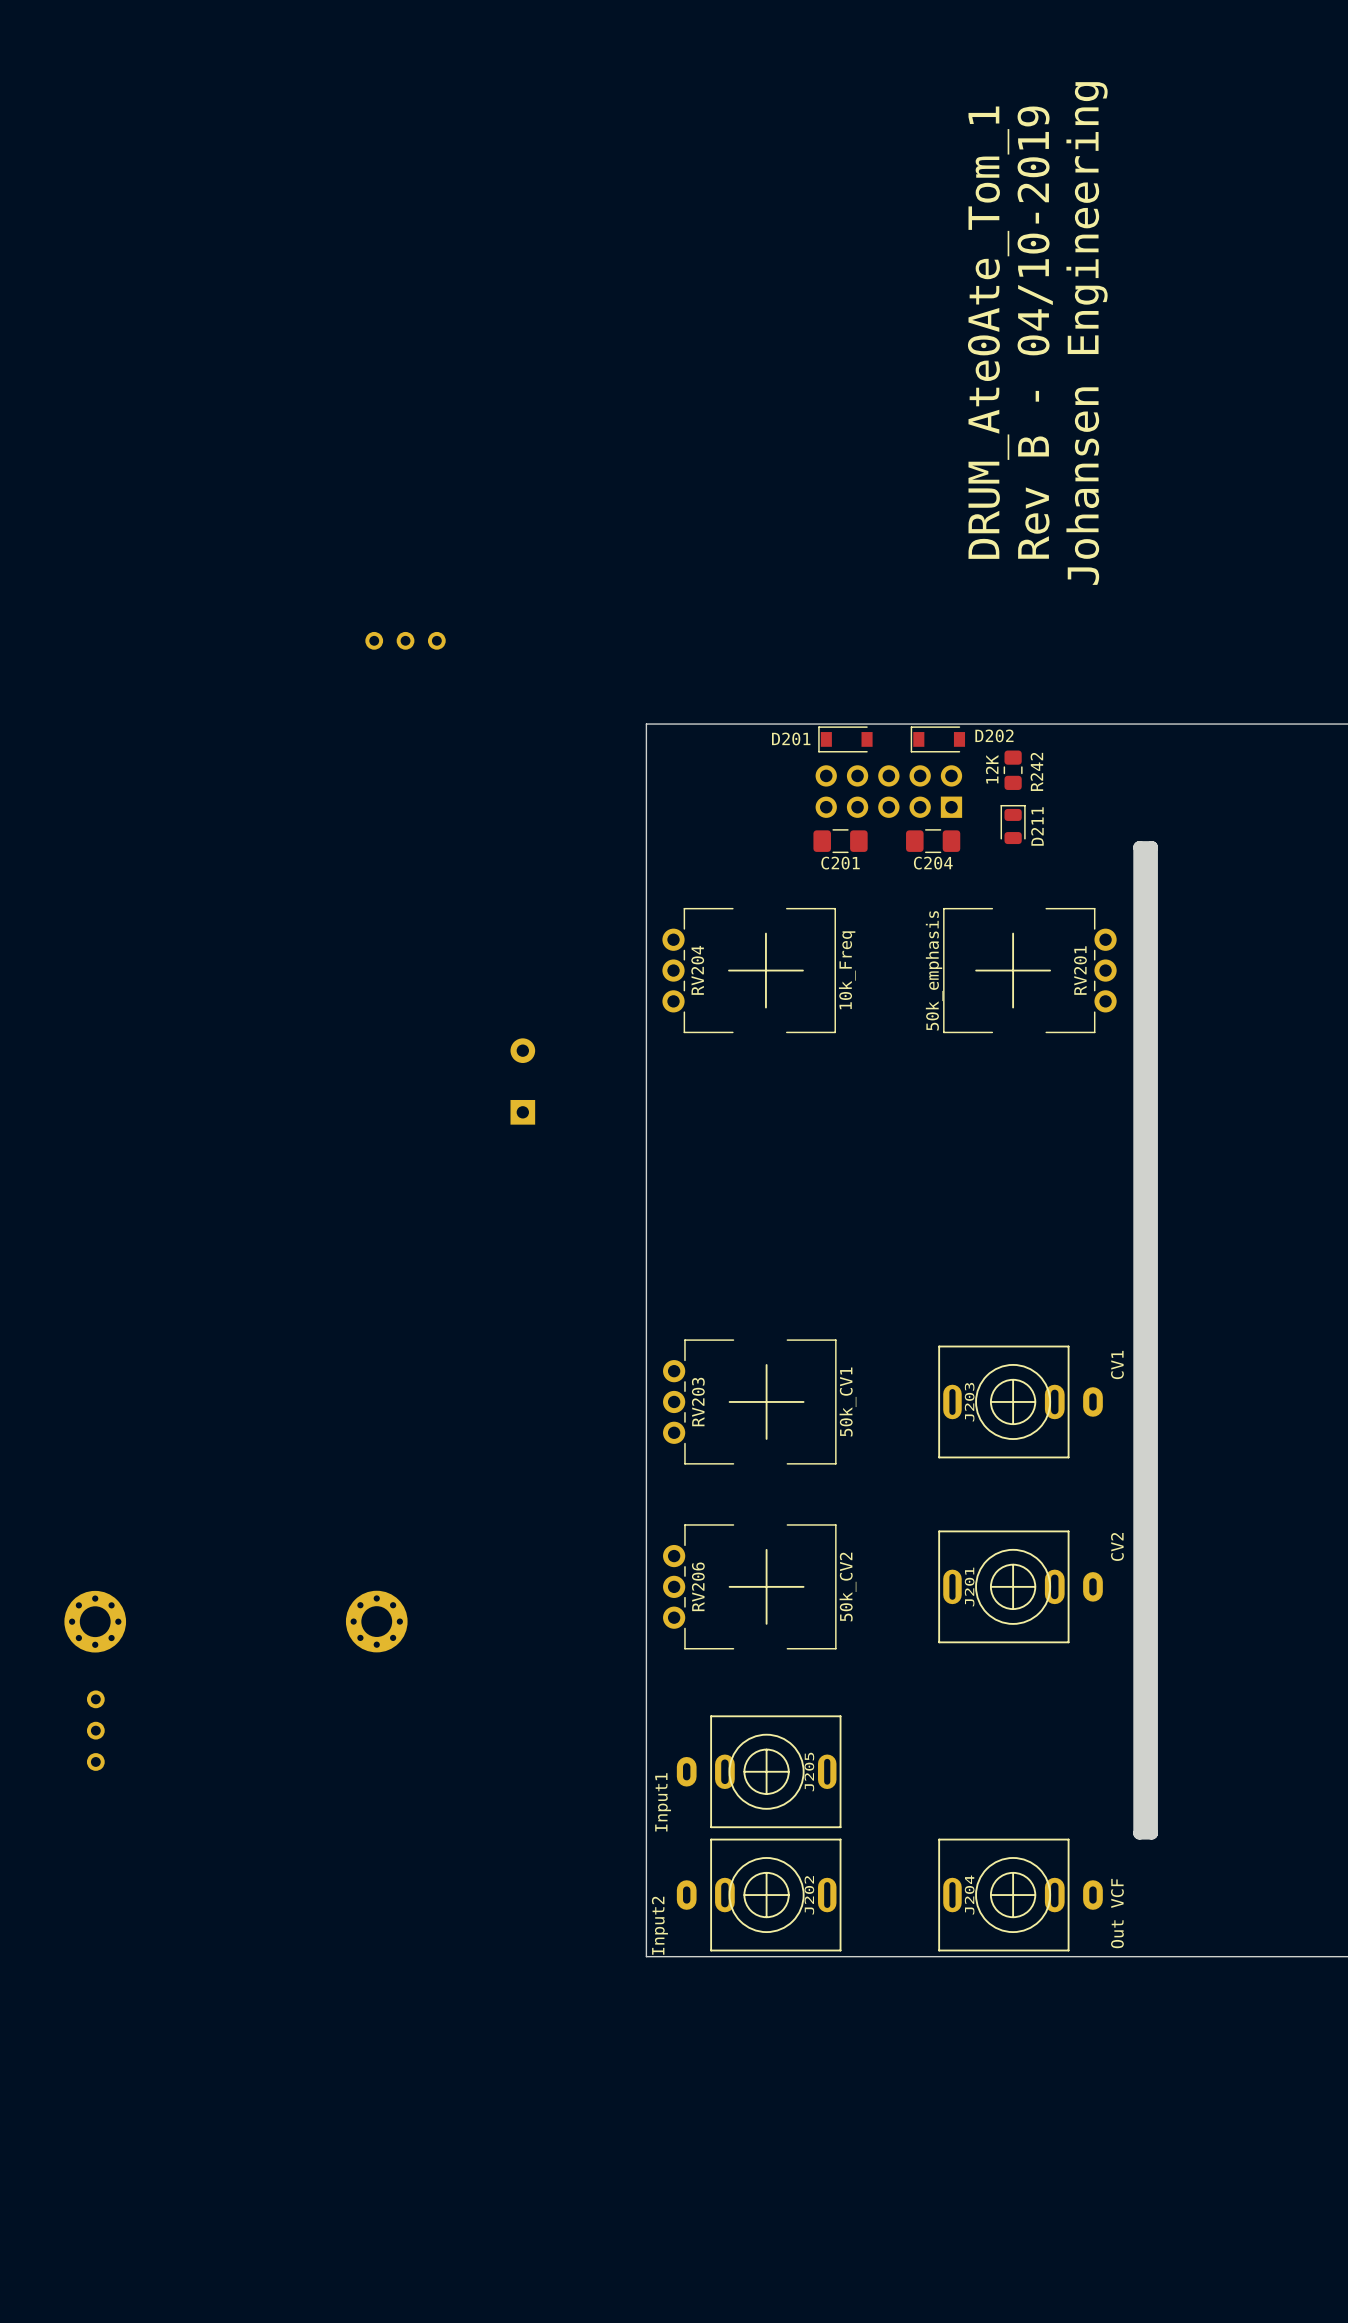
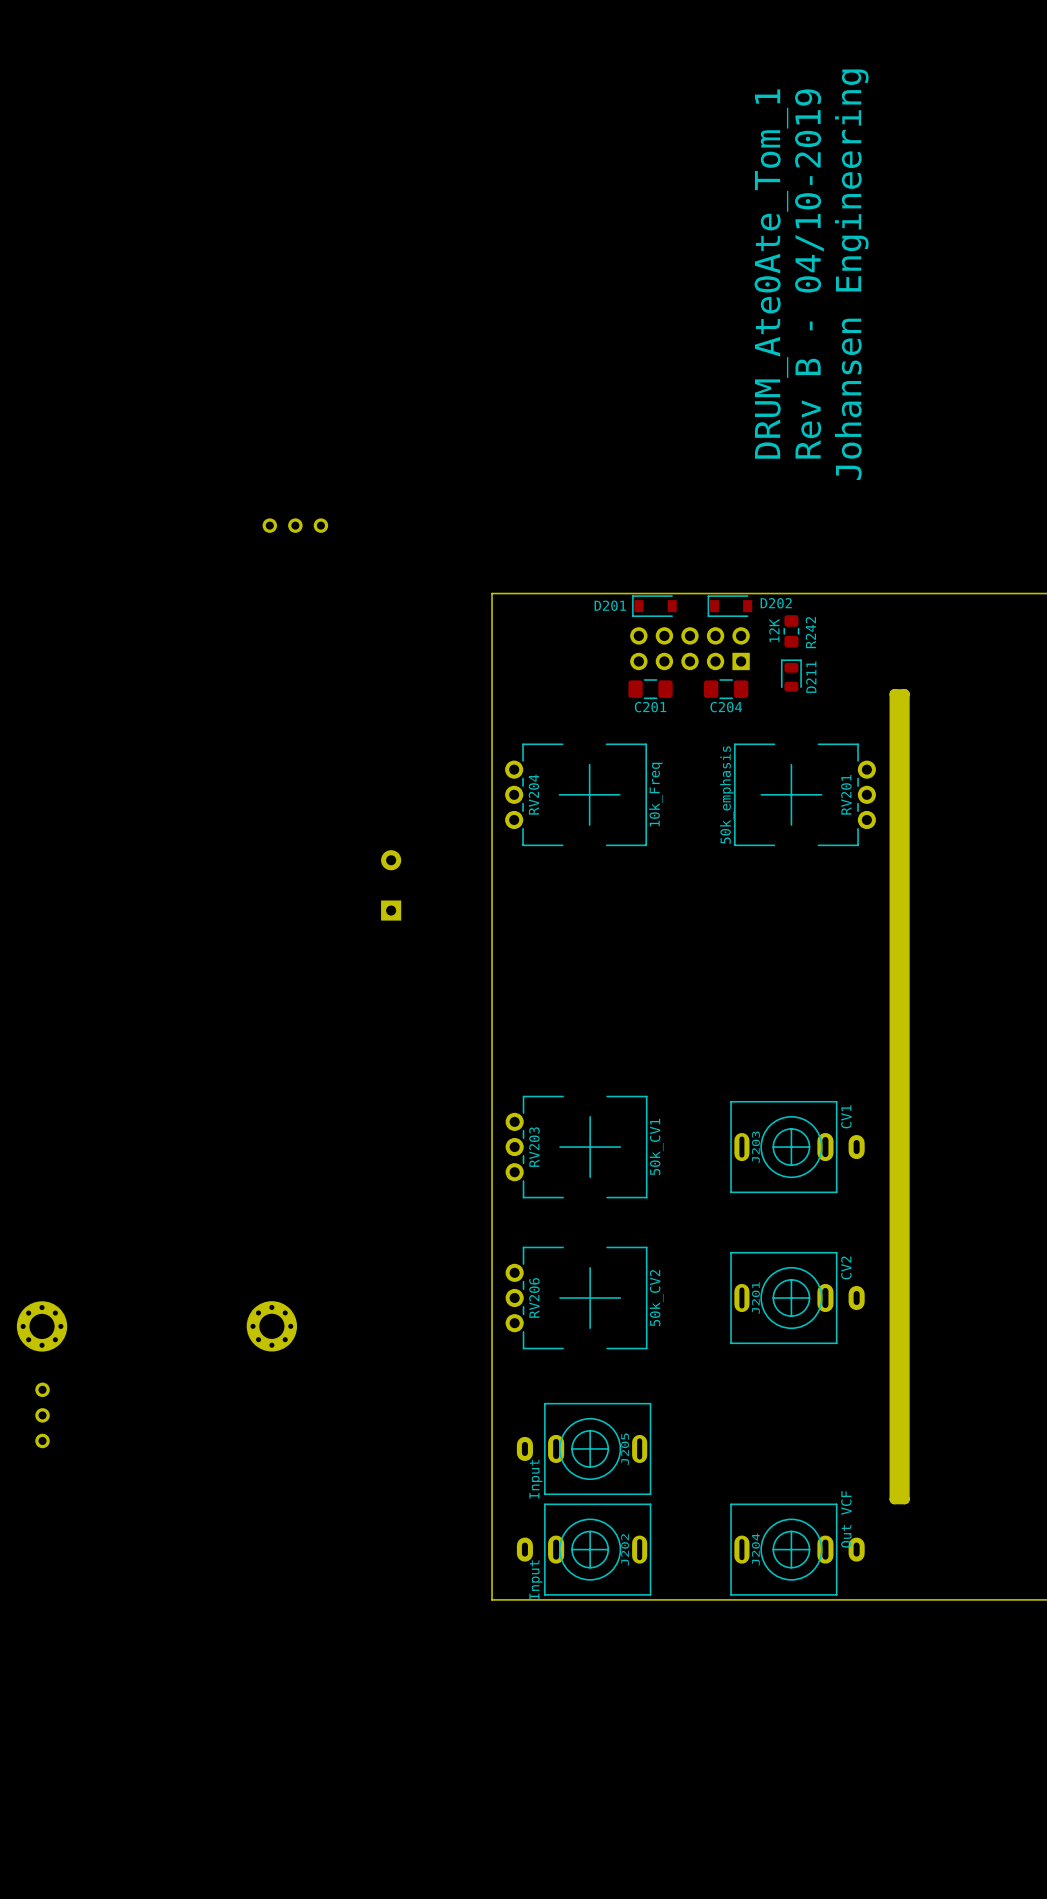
J203 value position: CV1 (1117, 1365) -> CV1 (846, 1116)
J201 value position: CV2 (1117, 1546) -> CV2 (846, 1267)
J205 value: Input1 (663, 1802) -> Input (535, 1479)
J204 value position: Out VCF (1117, 1913) -> Out VCF (846, 1519)
J202 value: Input2 (659, 1925) -> Input (535, 1579)

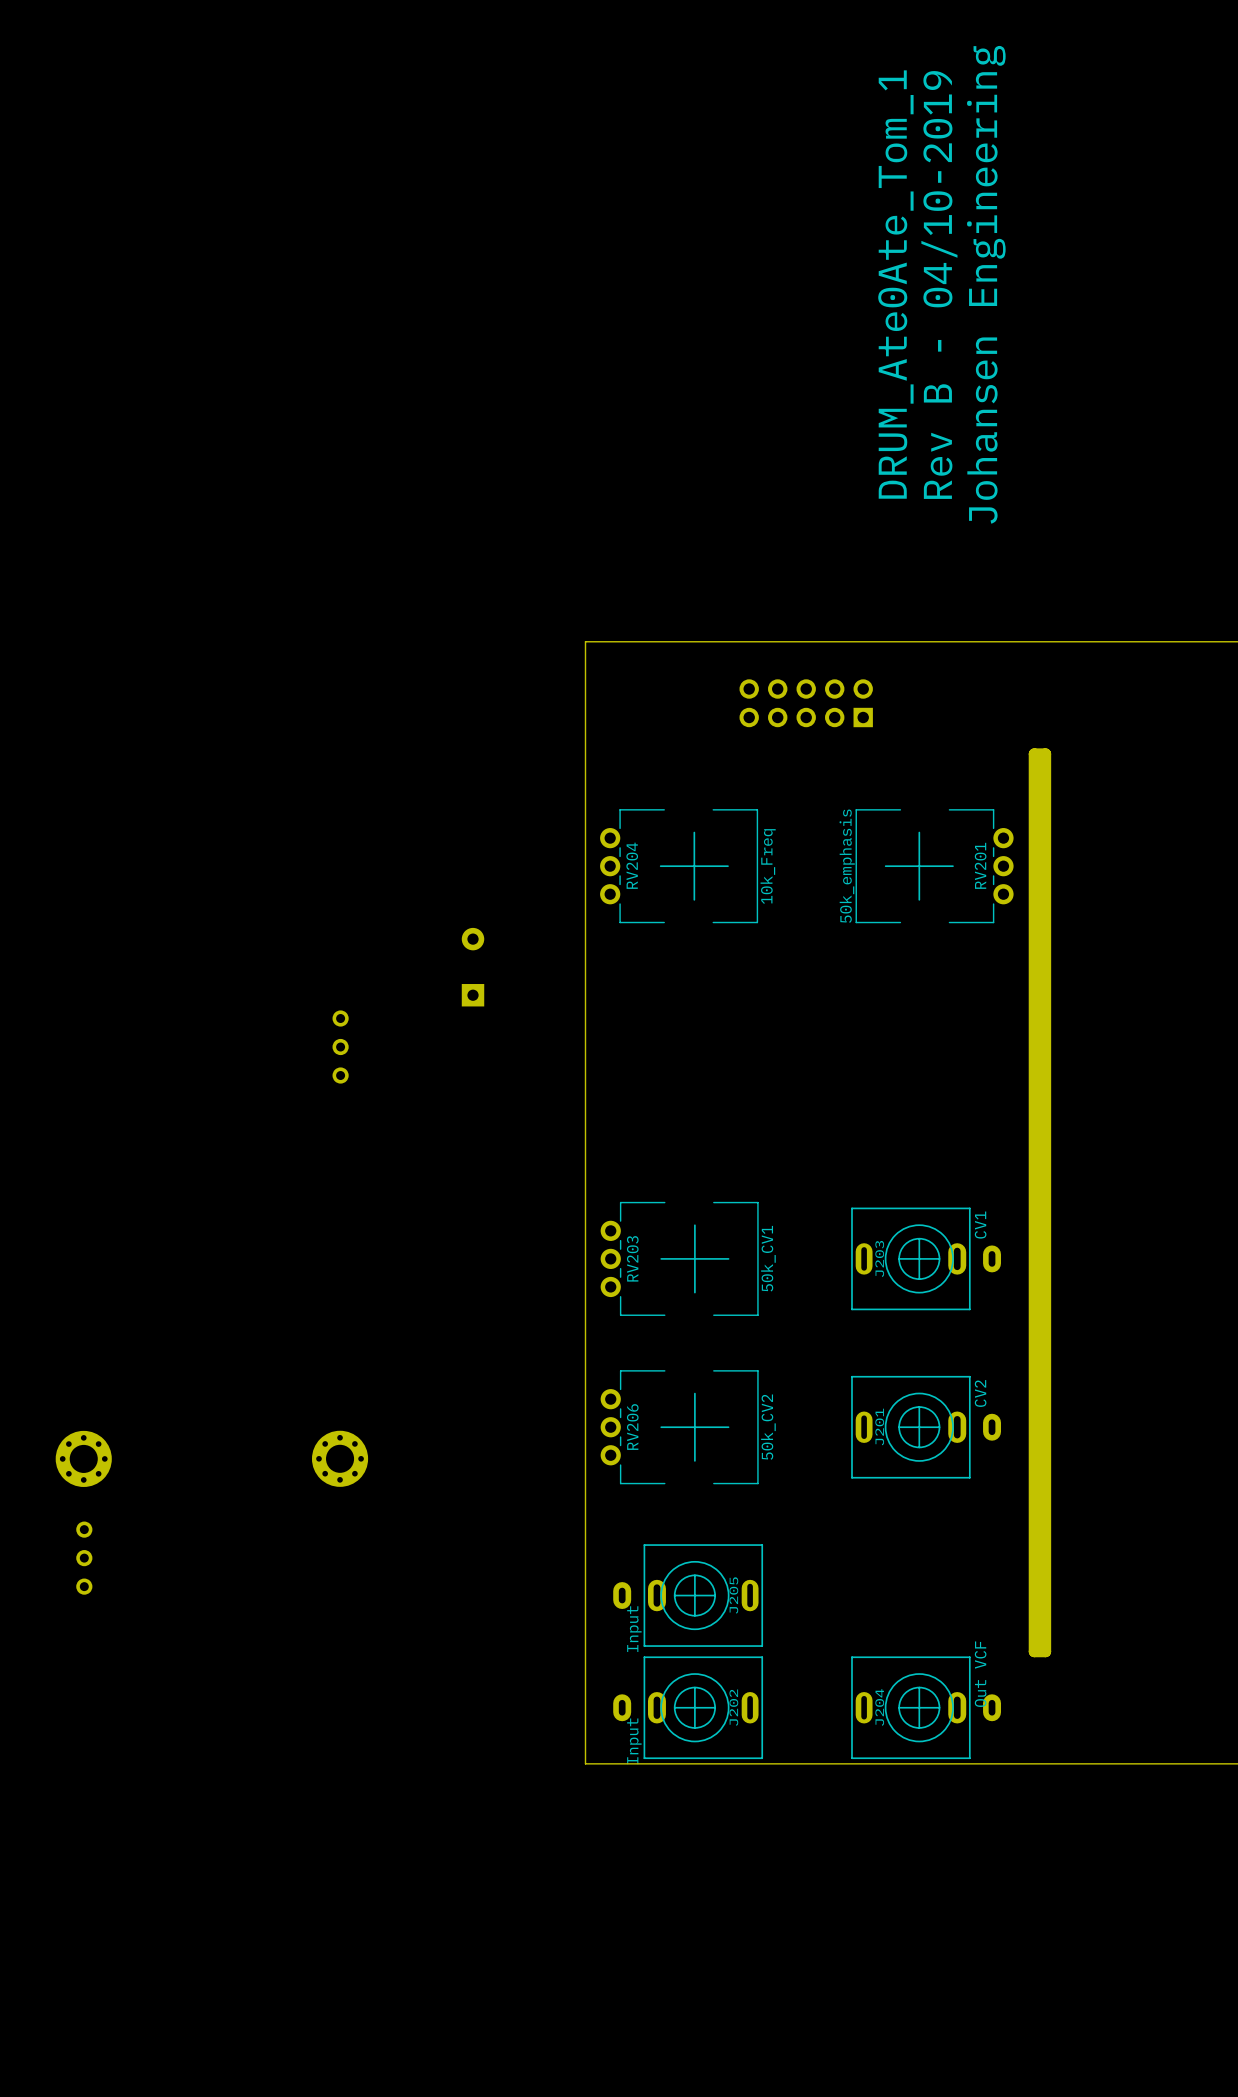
part: (295, 525) -> none
D201: (654, 606) -> none
D202: (729, 606) -> none
R242: 12K (791, 631) -> none
D211: (791, 675) -> none
C201: (650, 689) -> none
C204: (726, 689) -> none
part: none -> (340, 1047)

